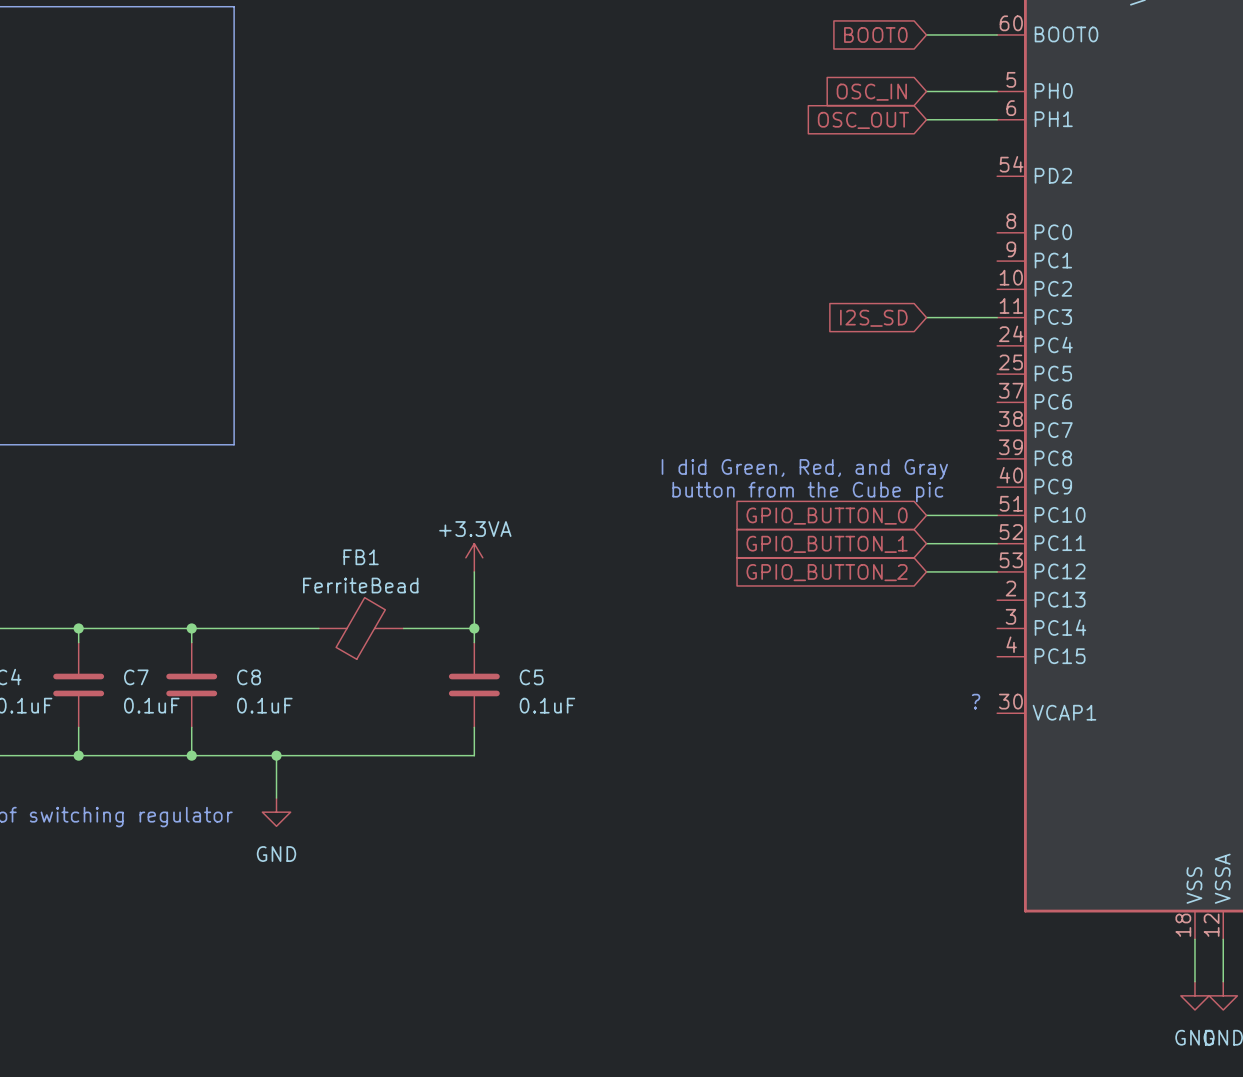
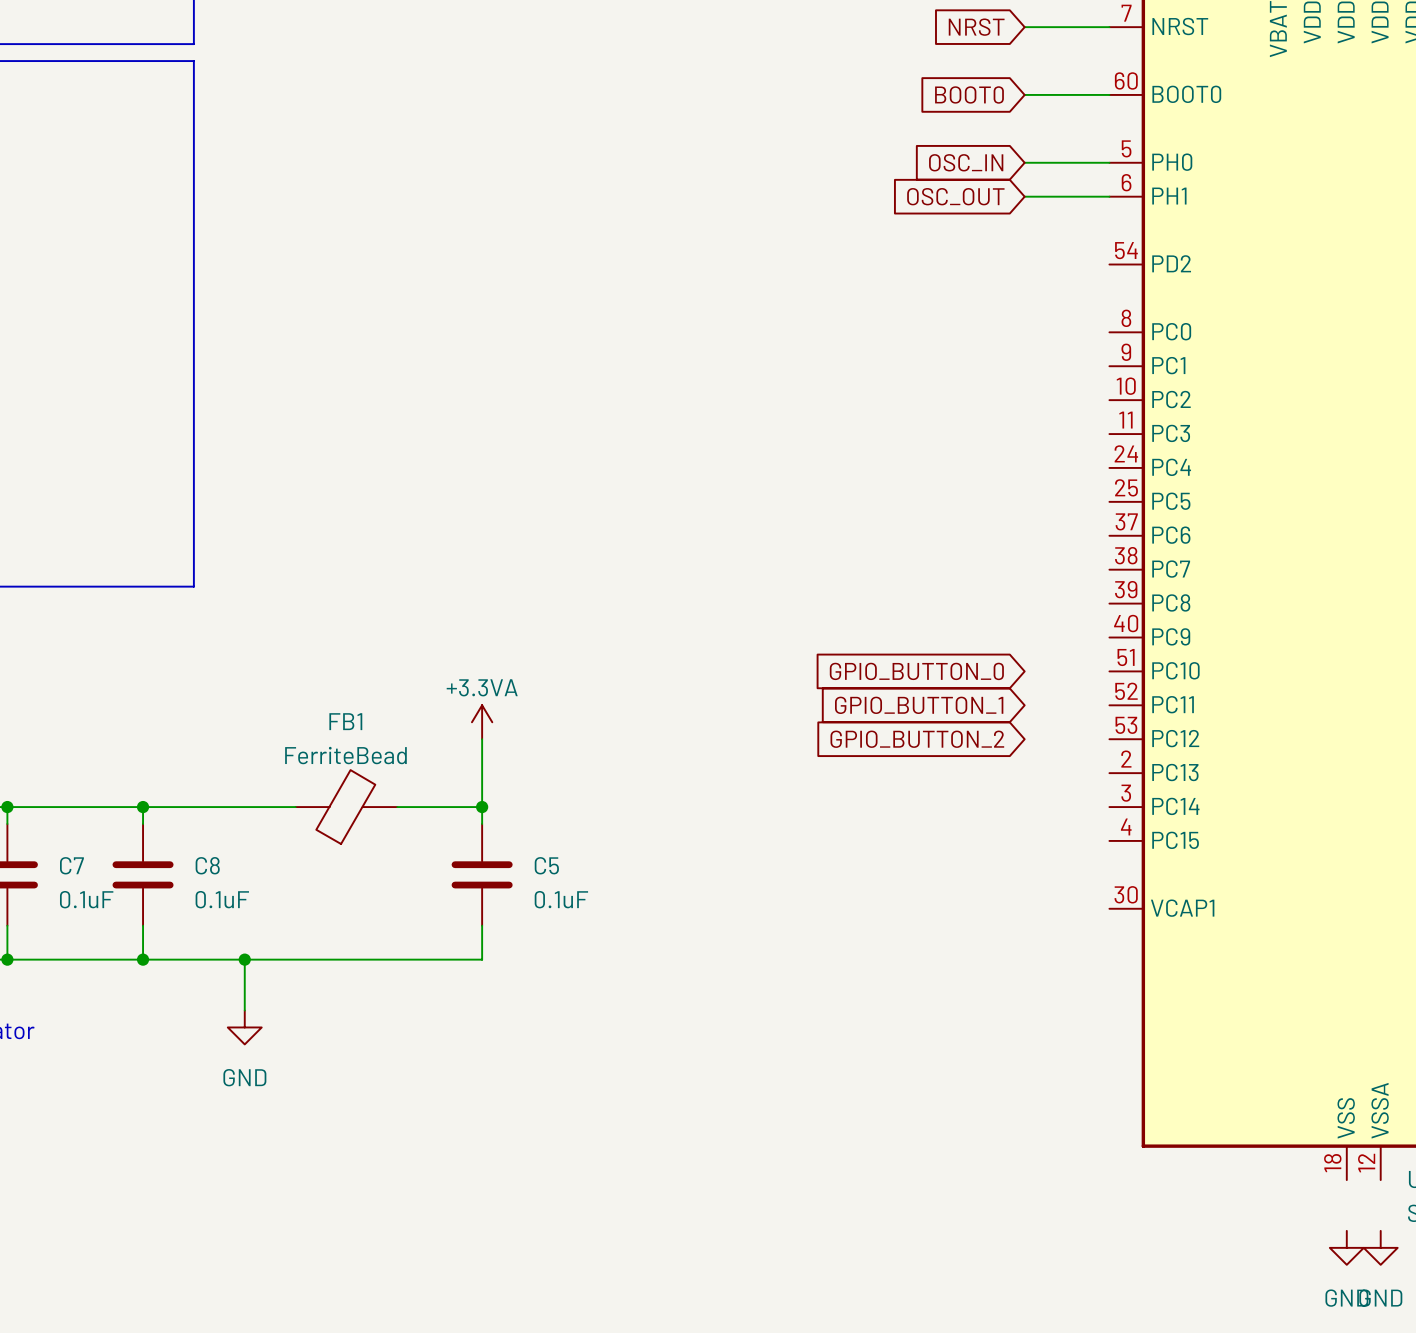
wire: (926, 317) (997, 317) -> none
global label: I2S_SD (873, 318) -> none
text: I did Green, Red, and Gray (804, 469) -> none
text: button from the Cube pic (807, 492) -> none
wire: (926, 515) (997, 515) -> none
wire: (926, 543) (997, 543) -> none
wire: (926, 571) (997, 571) -> none
text: ? (976, 701) -> none
wire: (1194, 939) (1194, 981) -> none
wire: (1223, 939) (1223, 981) -> none

